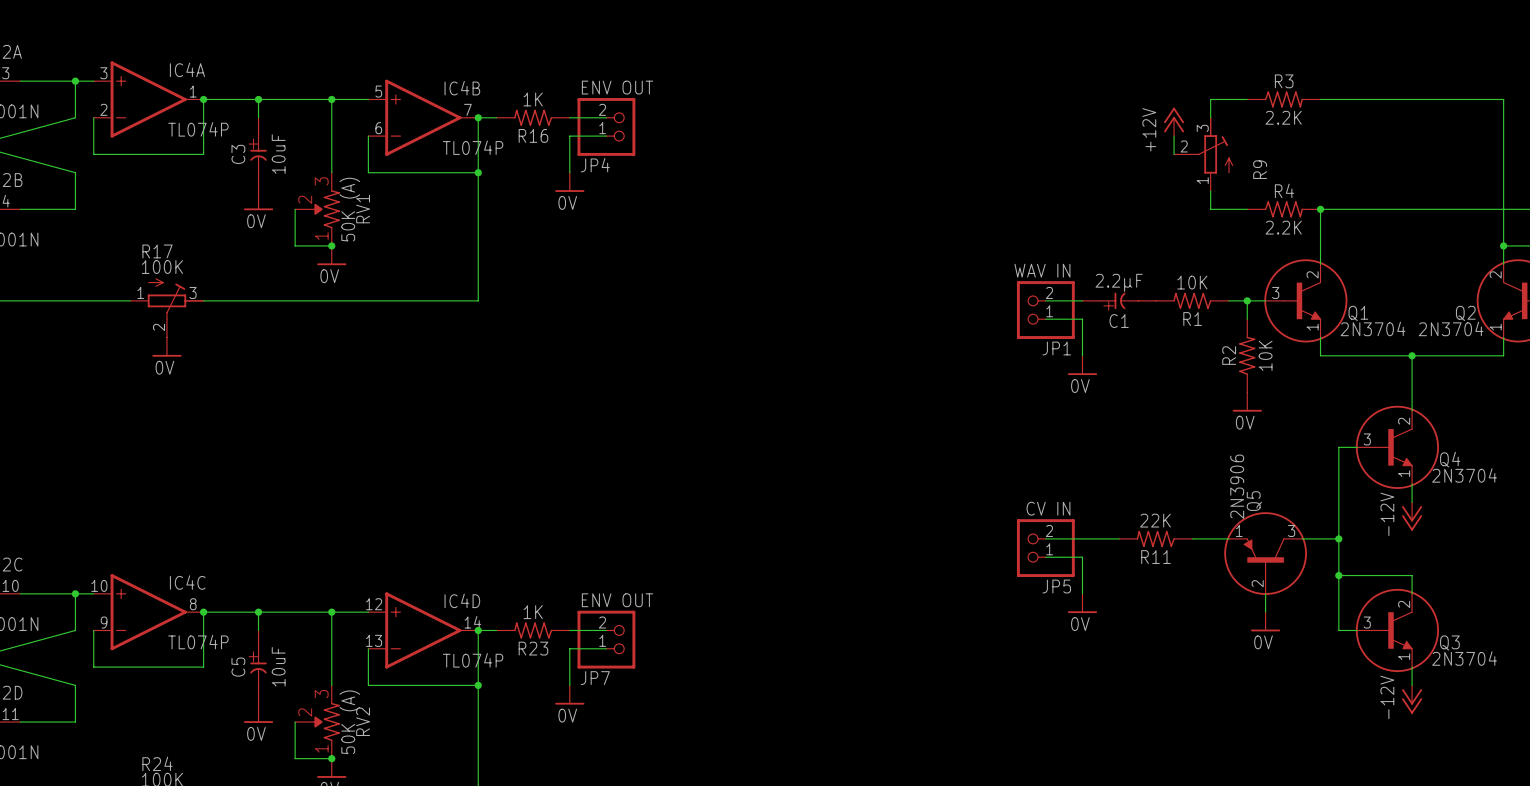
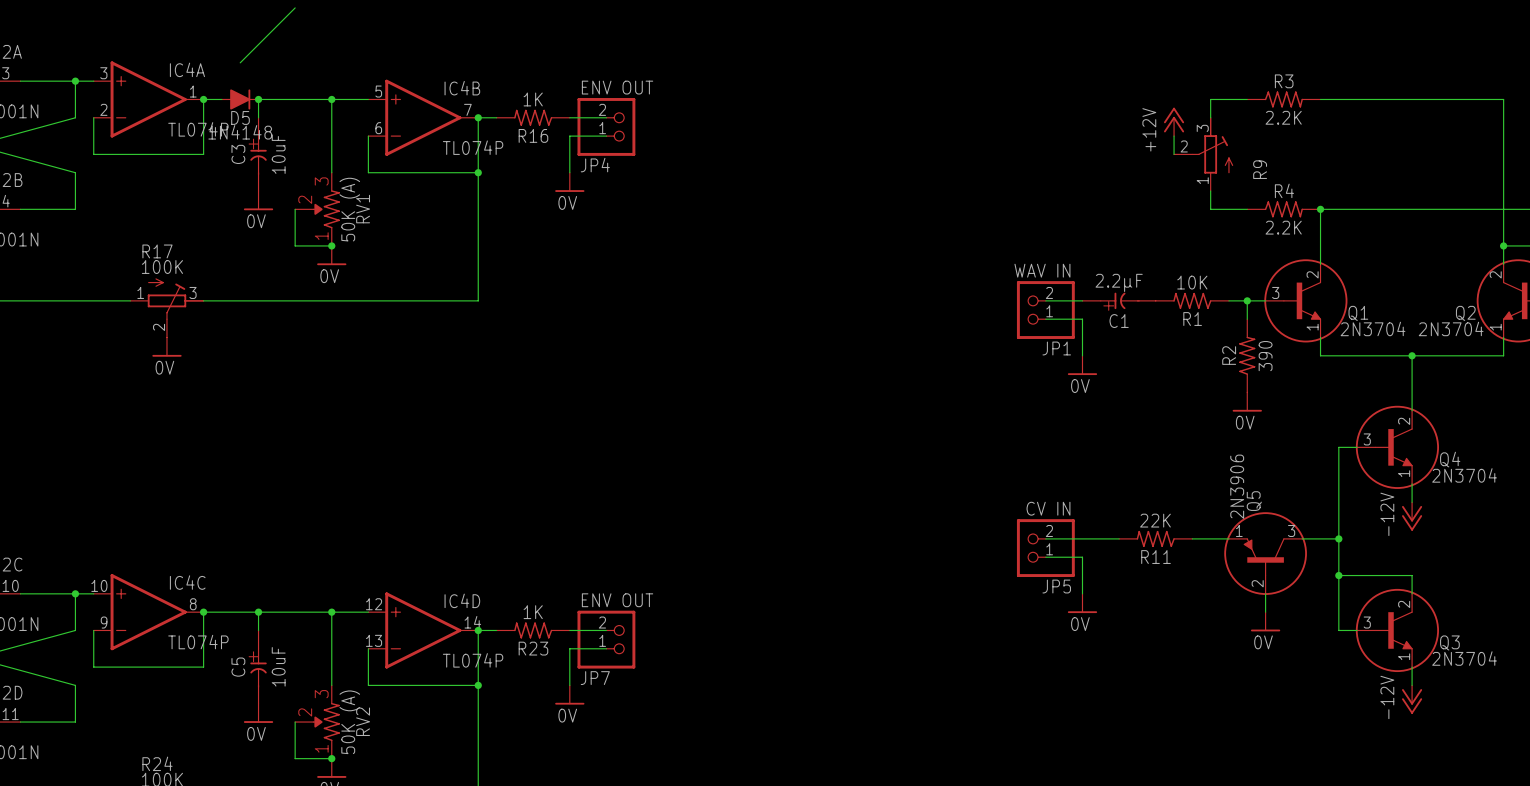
wire: none -> (295, 7) (240, 62)
D5: none -> 1N4148 (240, 99)
R2 value: 10K (1265, 355) -> 390 (1265, 356)

